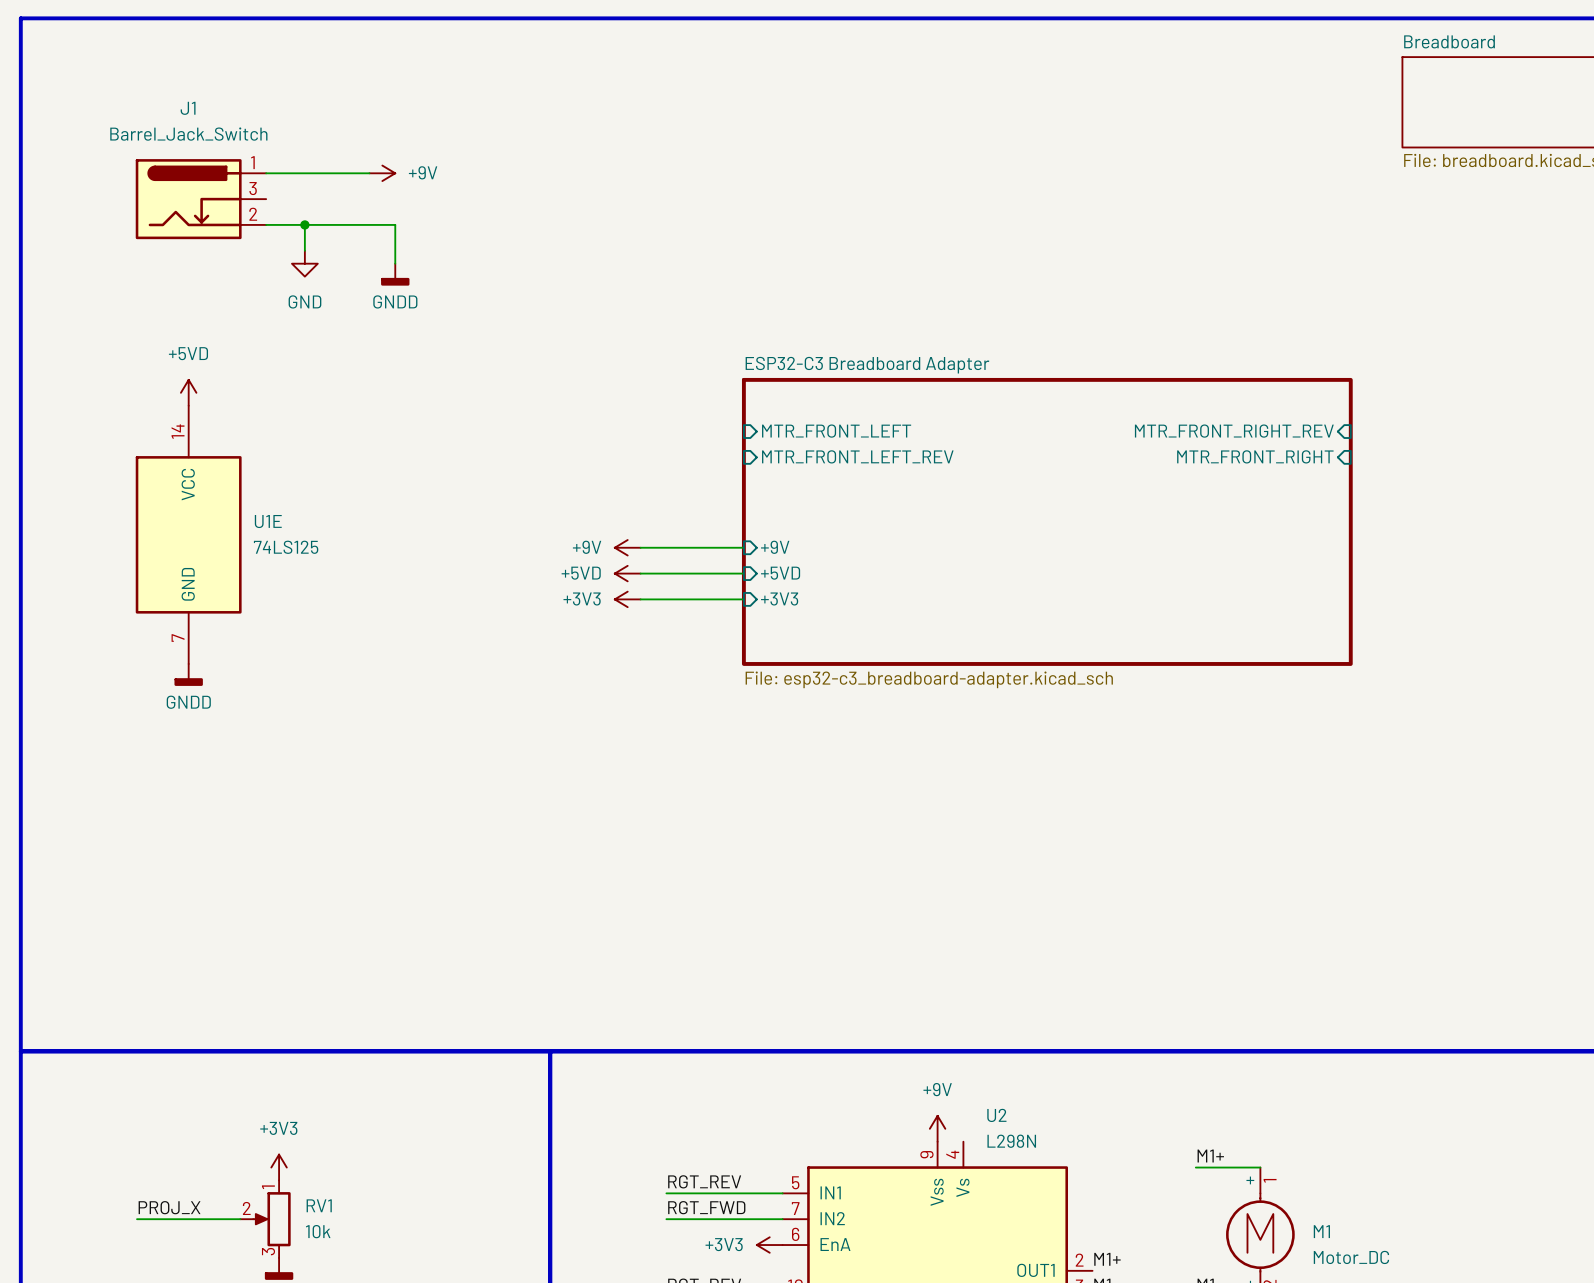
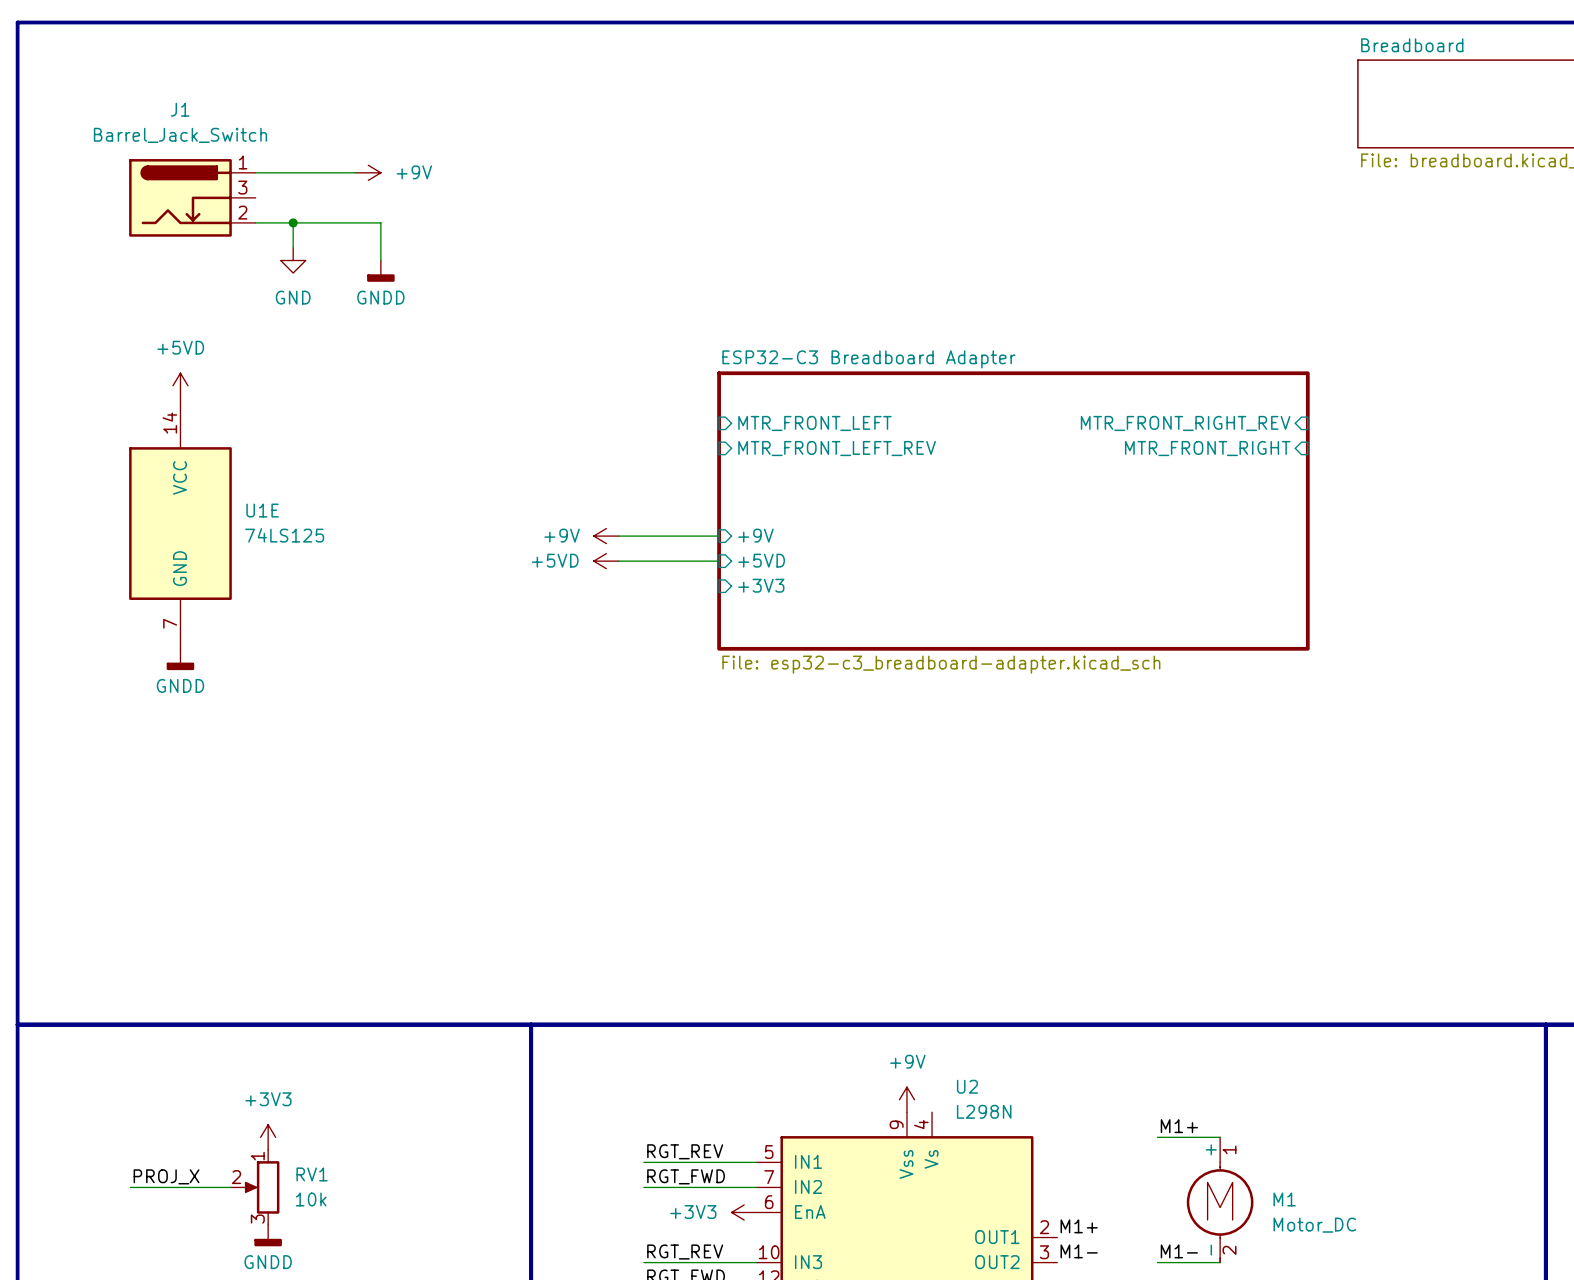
power symbol: +3V3 (627, 599) -> none
wire: (640, 599) (743, 599) -> none

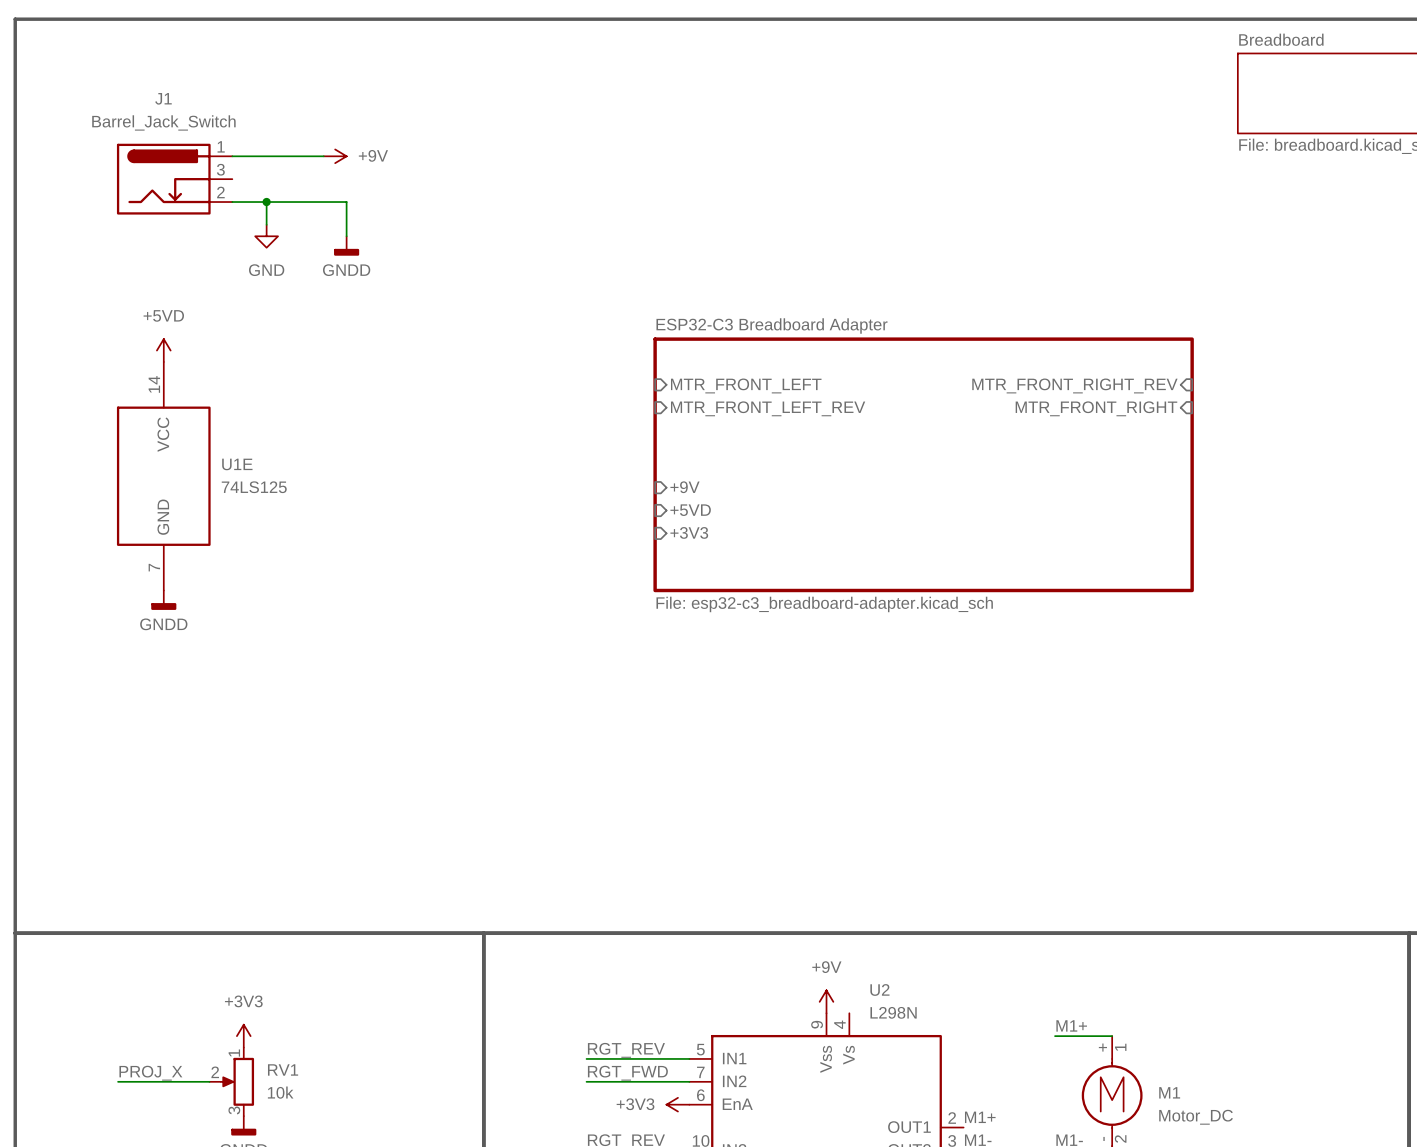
power symbol: +9V (606, 536) -> none
wire: (618, 536) (719, 536) -> none
power symbol: +5VD (606, 561) -> none
wire: (618, 561) (719, 561) -> none

